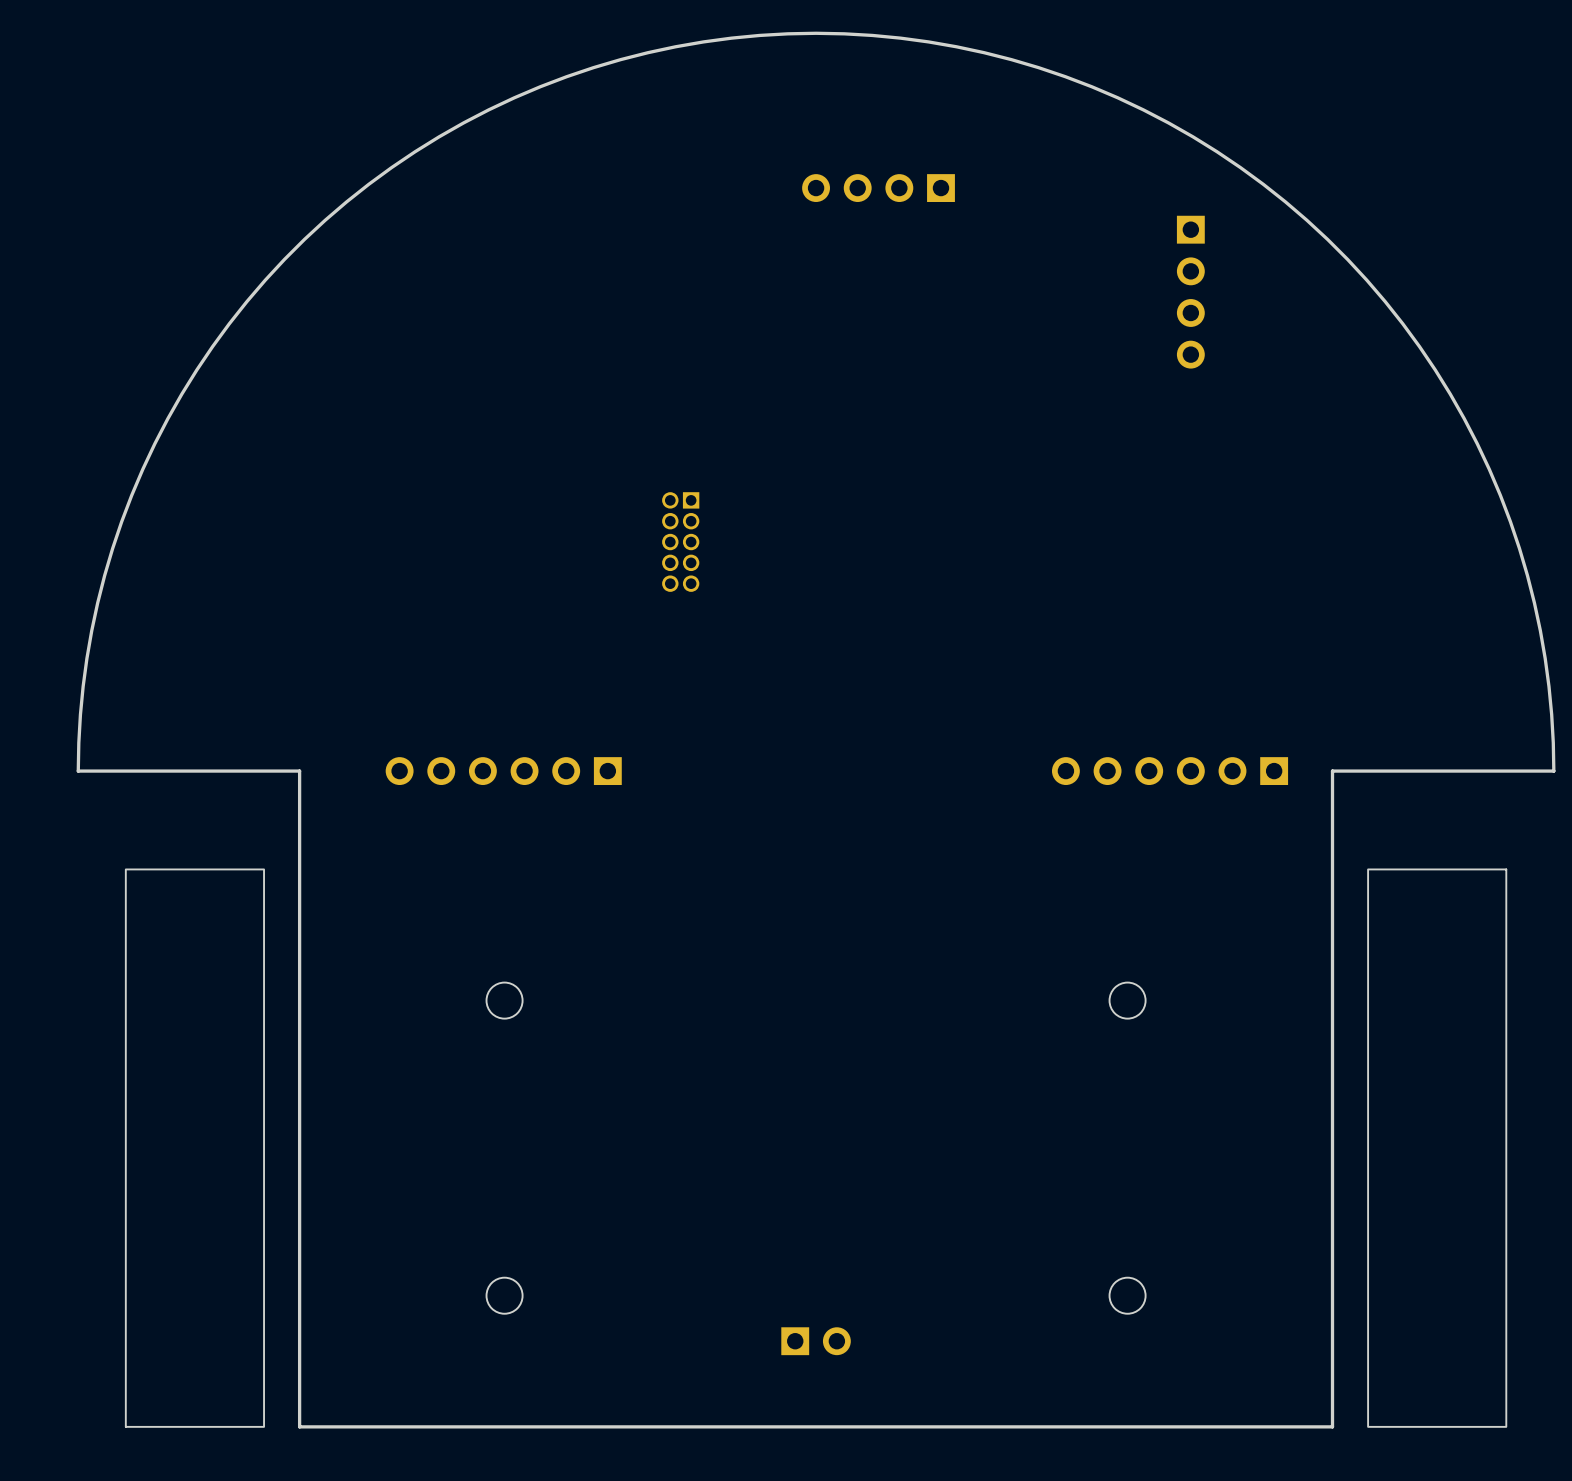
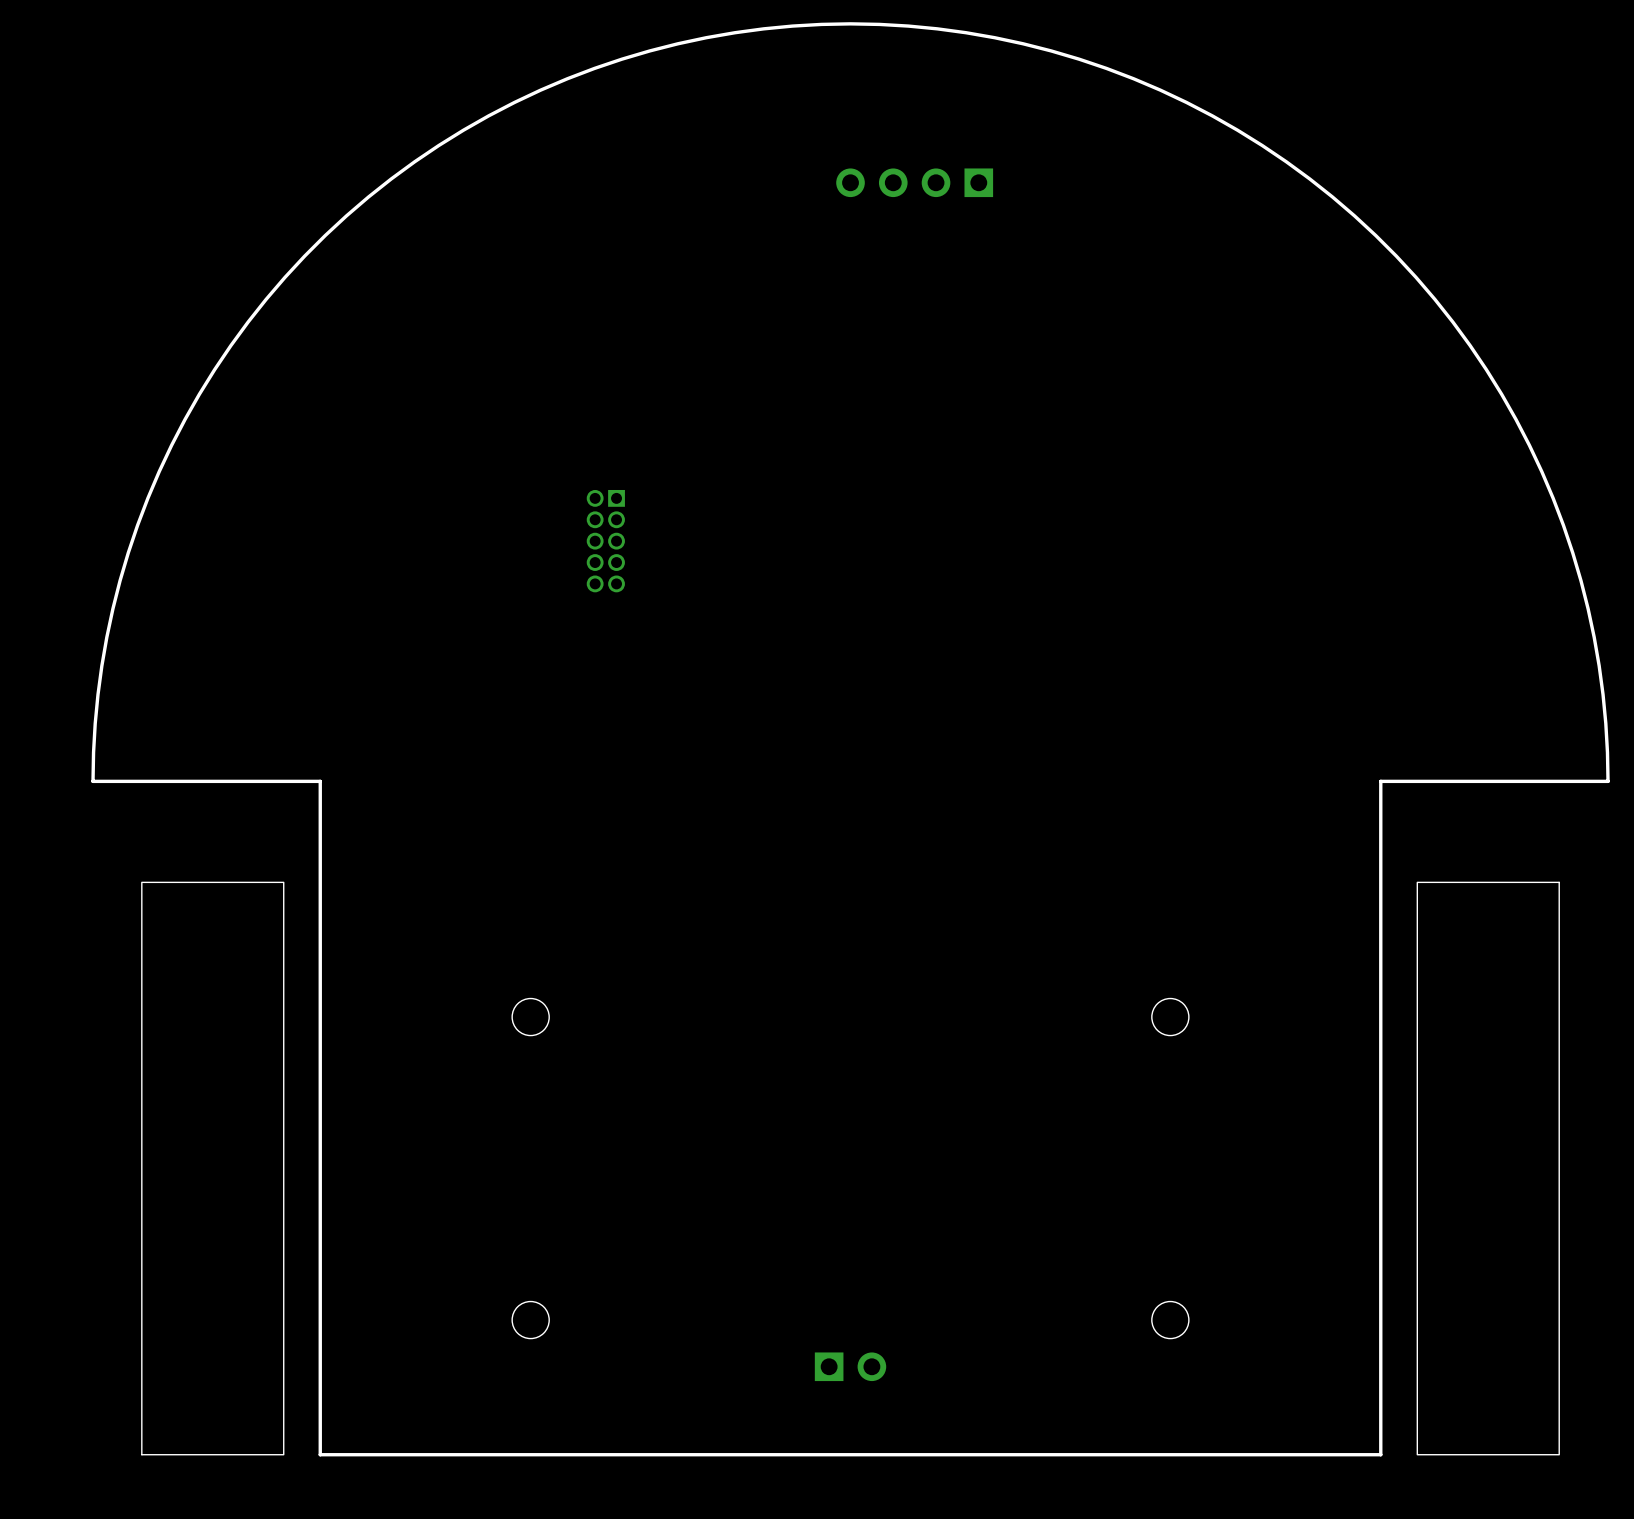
part: (1190, 292) -> none
part position: (680, 542) -> (605, 541)
part: (503, 771) -> none
part: (1170, 771) -> none

